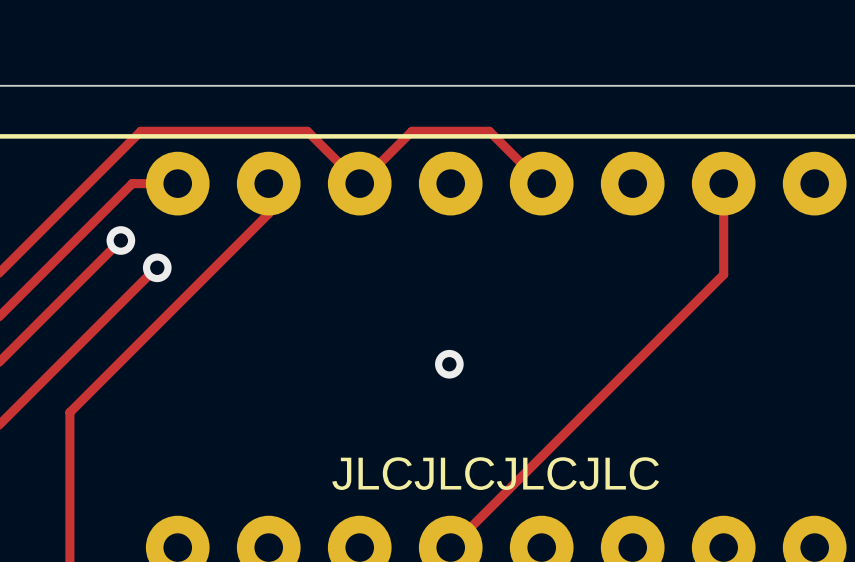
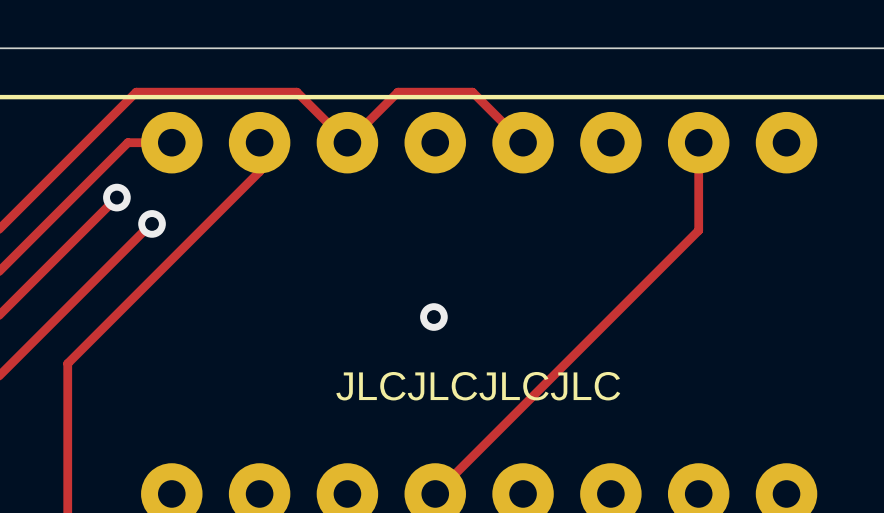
text: none -> JLCJLCJLCJLC (478, 386)
part value: JLCJLCJLCJLC (495, 473) -> none

